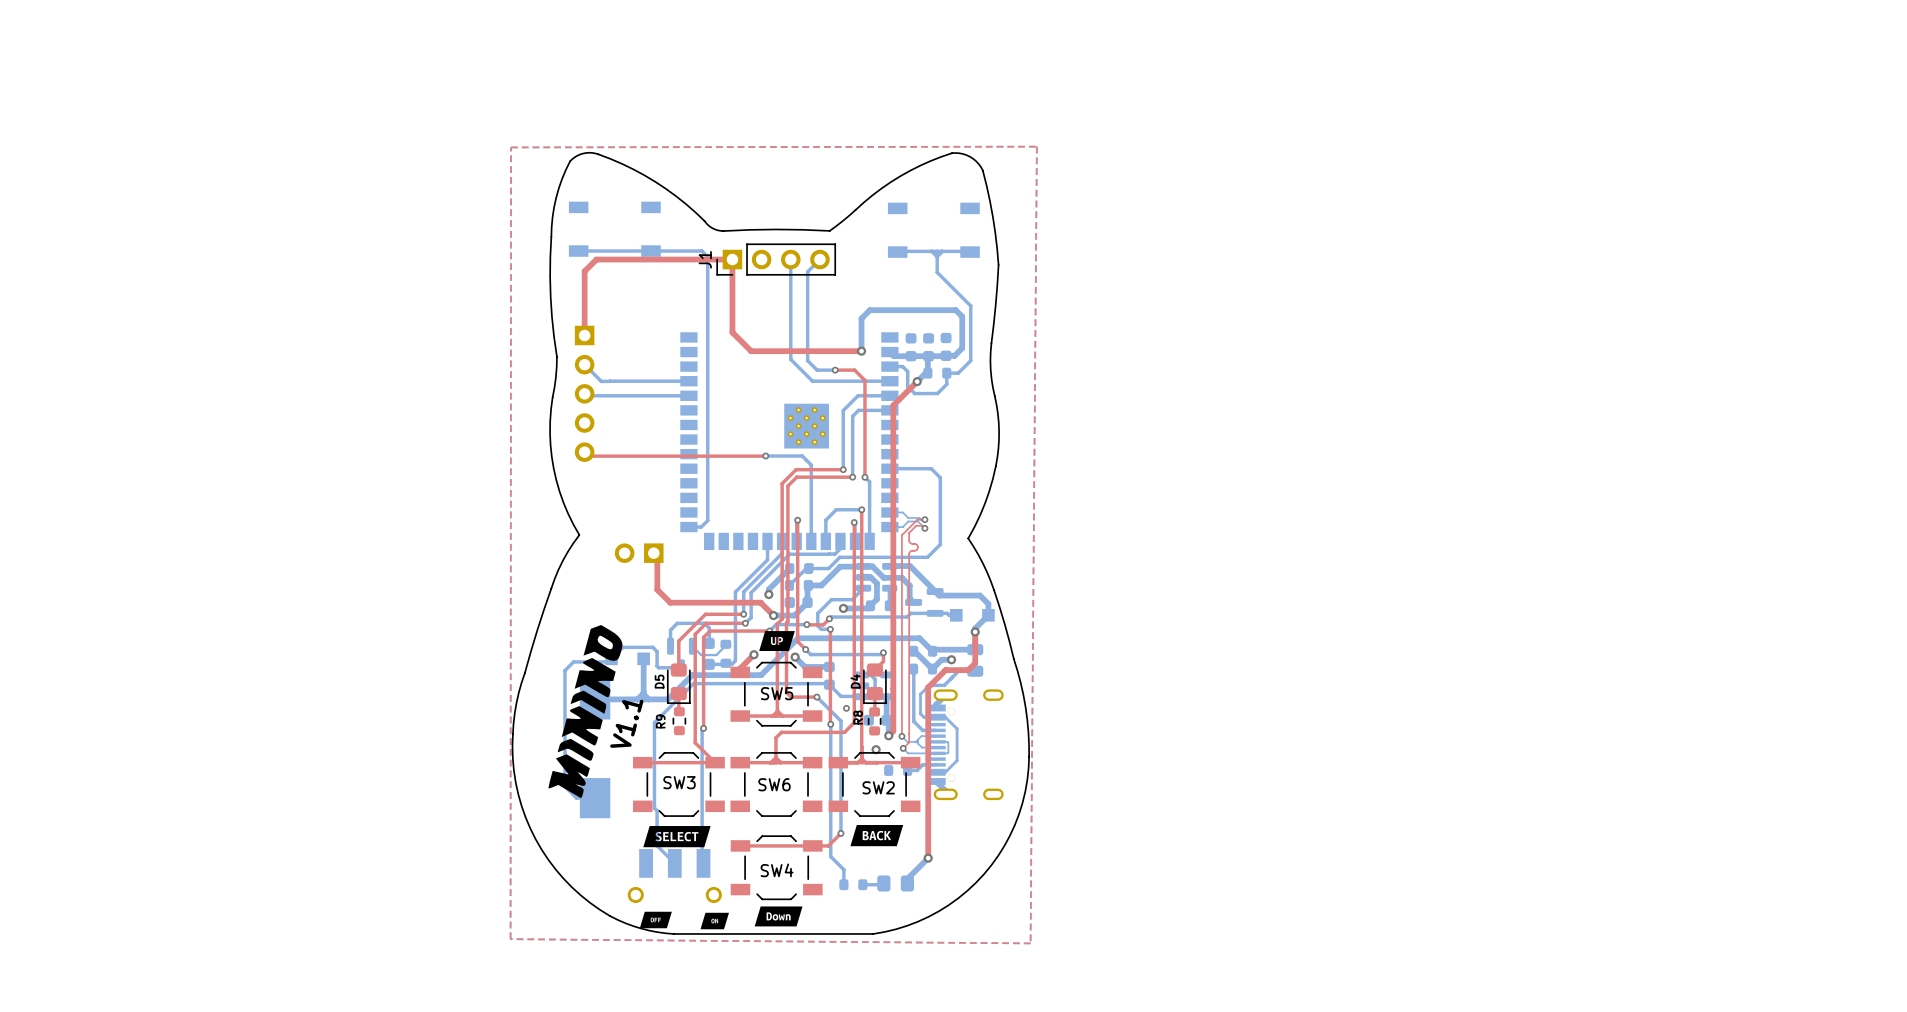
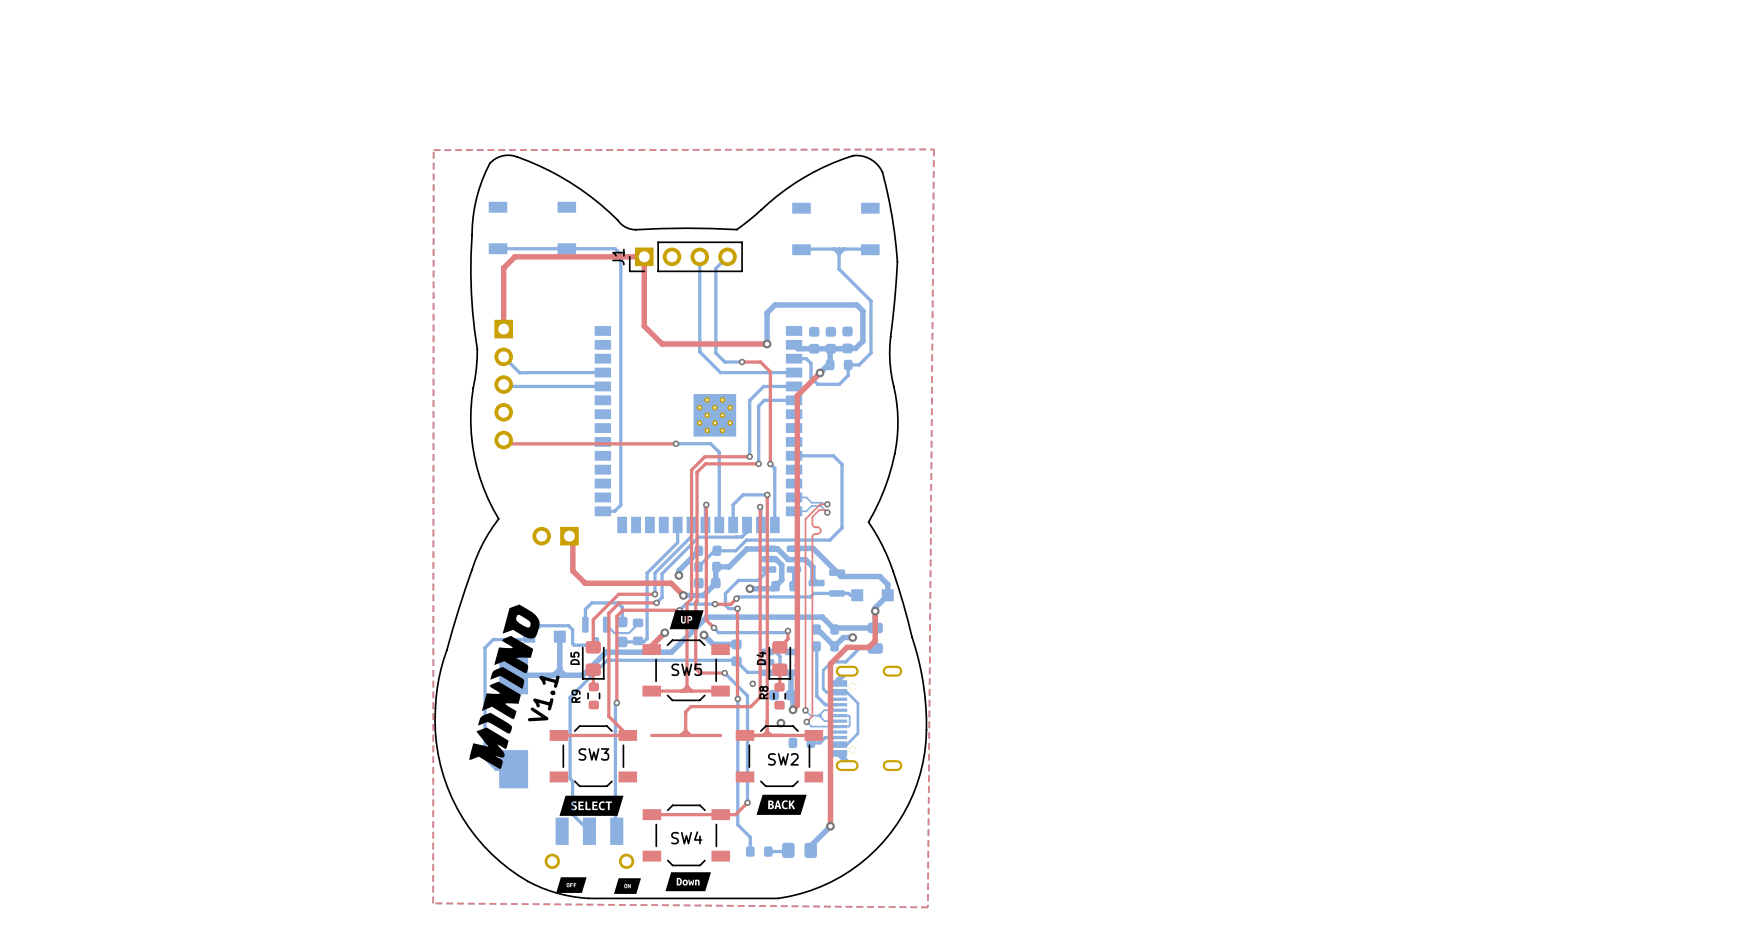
SW6: (776, 784) -> none

